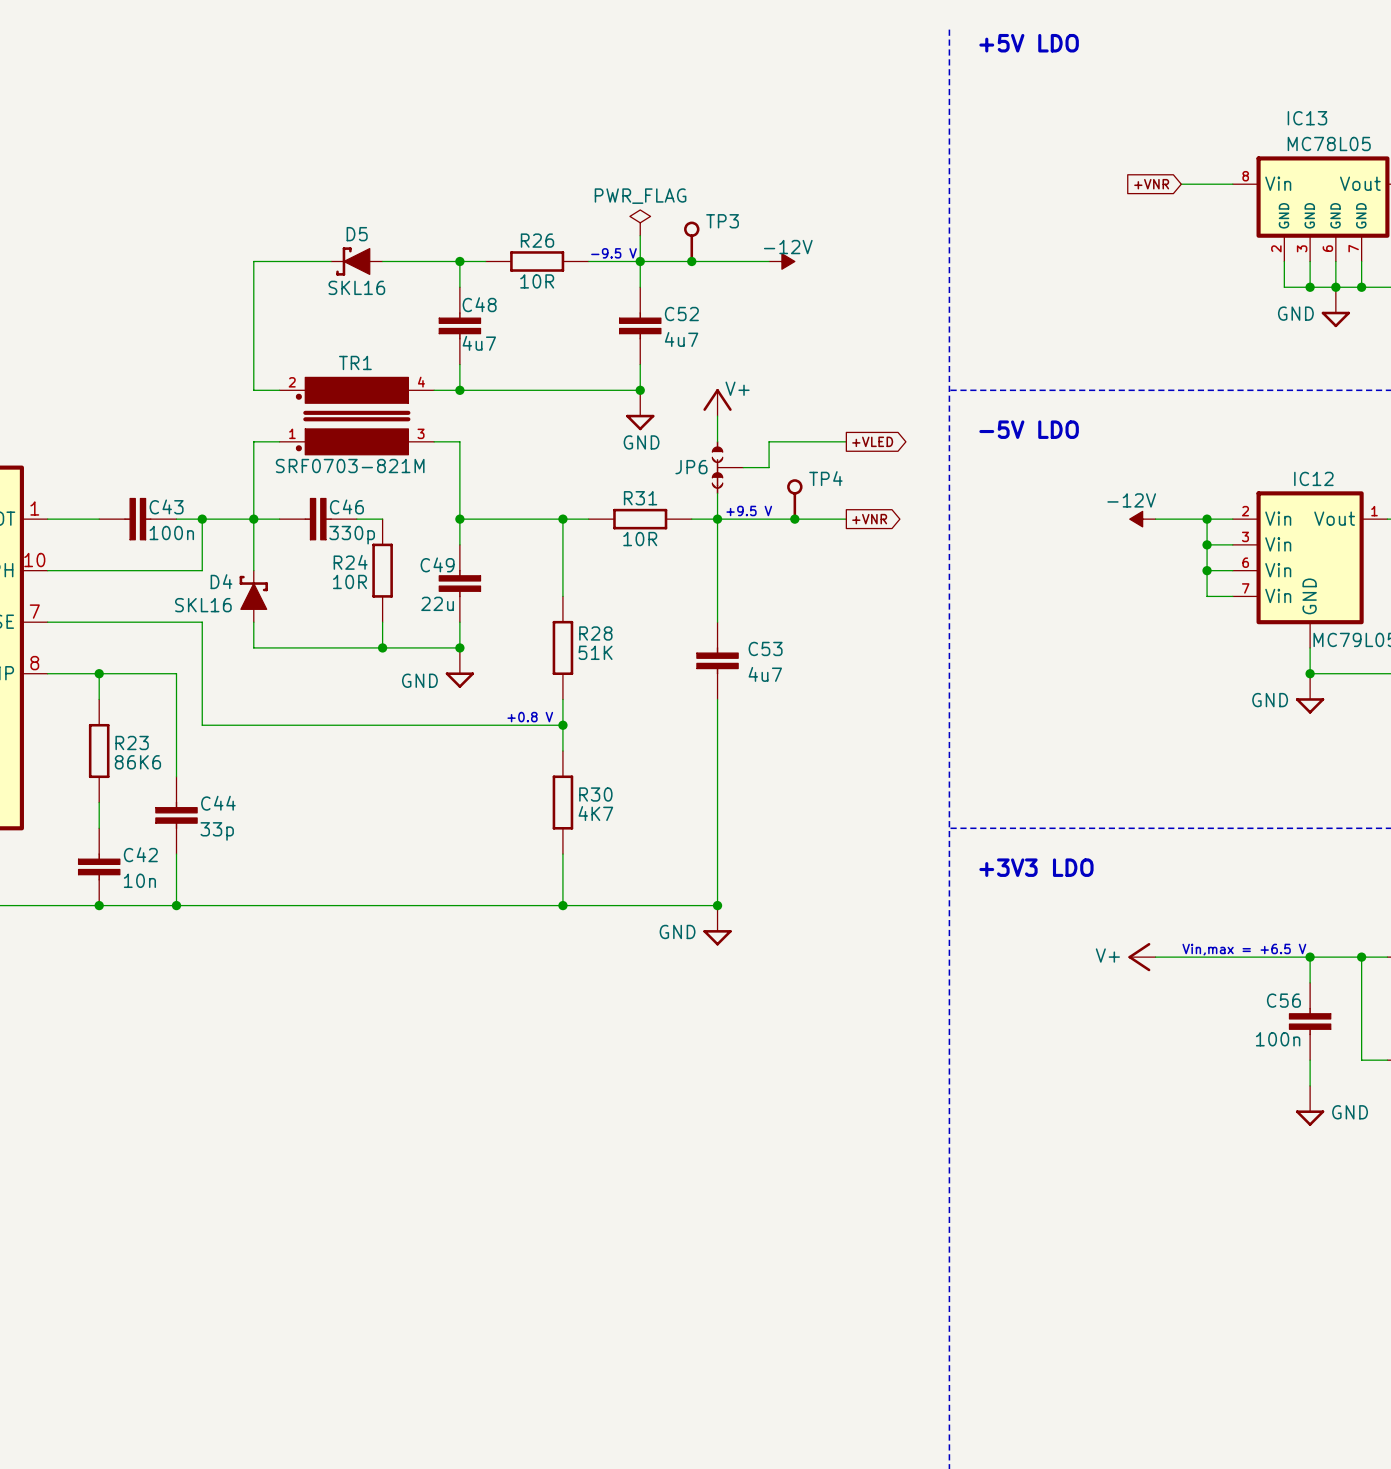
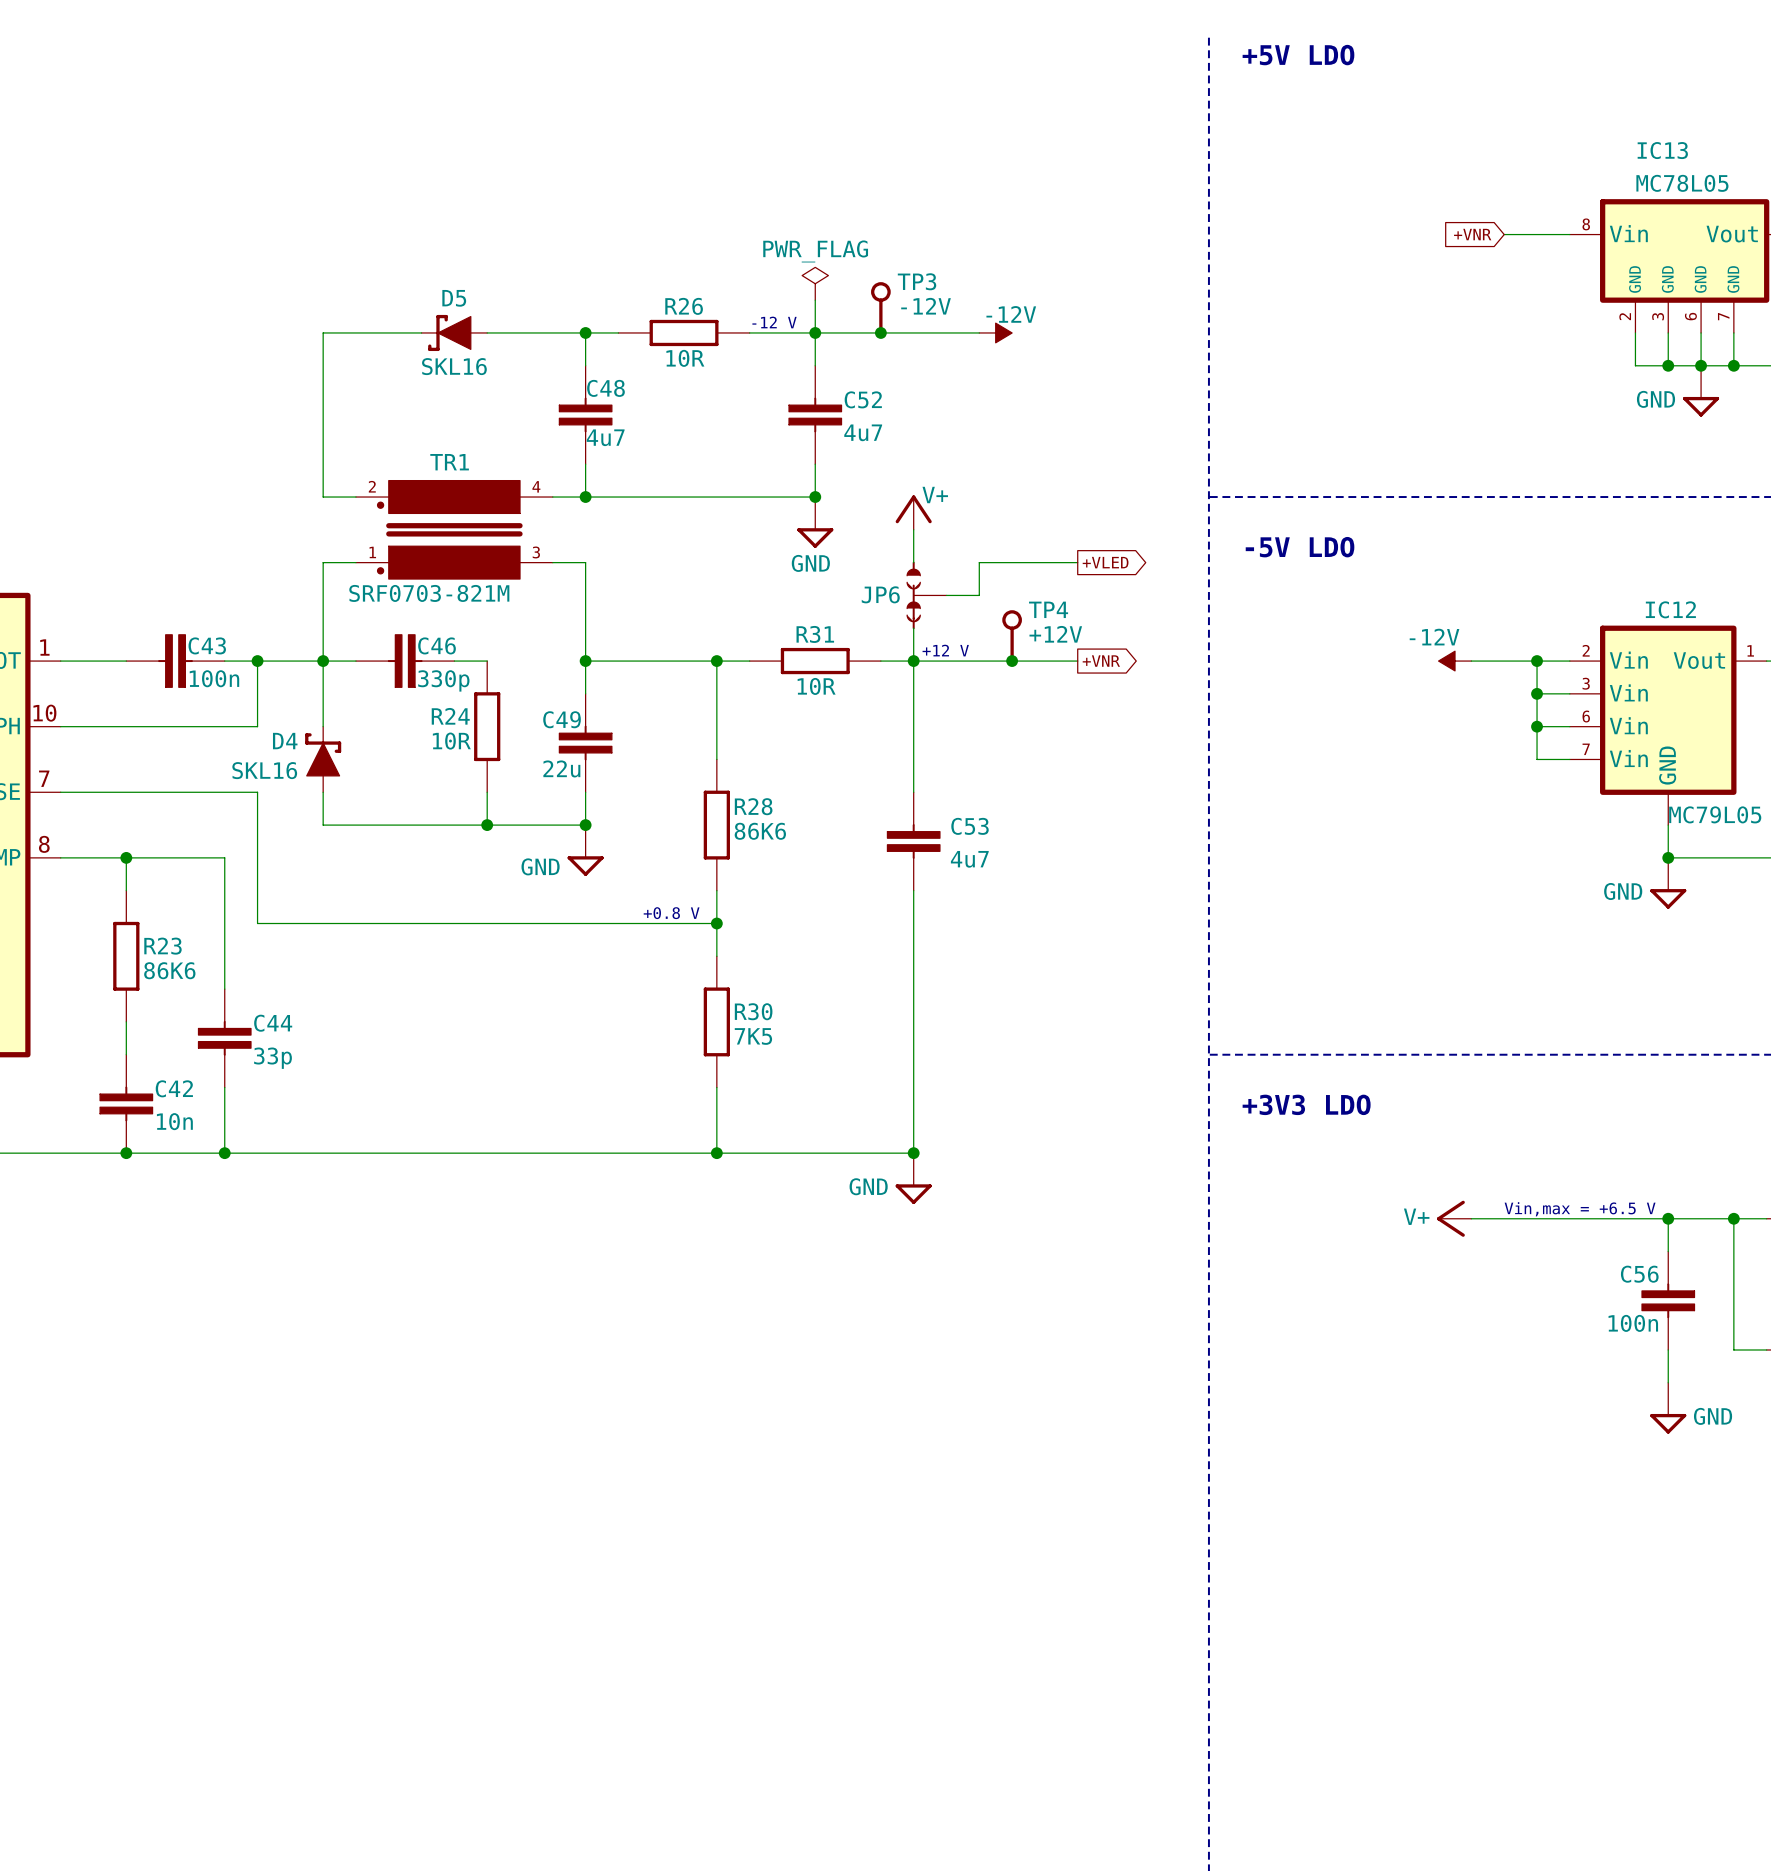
TP3 text: none -> -12V (926, 306)
text: -9.5 V (613, 253) -> -12 V (774, 322)
TP4 text: none -> +12V (1055, 634)
text: +9.5 V (749, 510) -> +12 V (945, 650)
R28 value: 51K (595, 652) -> 86K6 (760, 831)
R30 value: 4K7 (595, 813) -> 7K5 (753, 1036)

